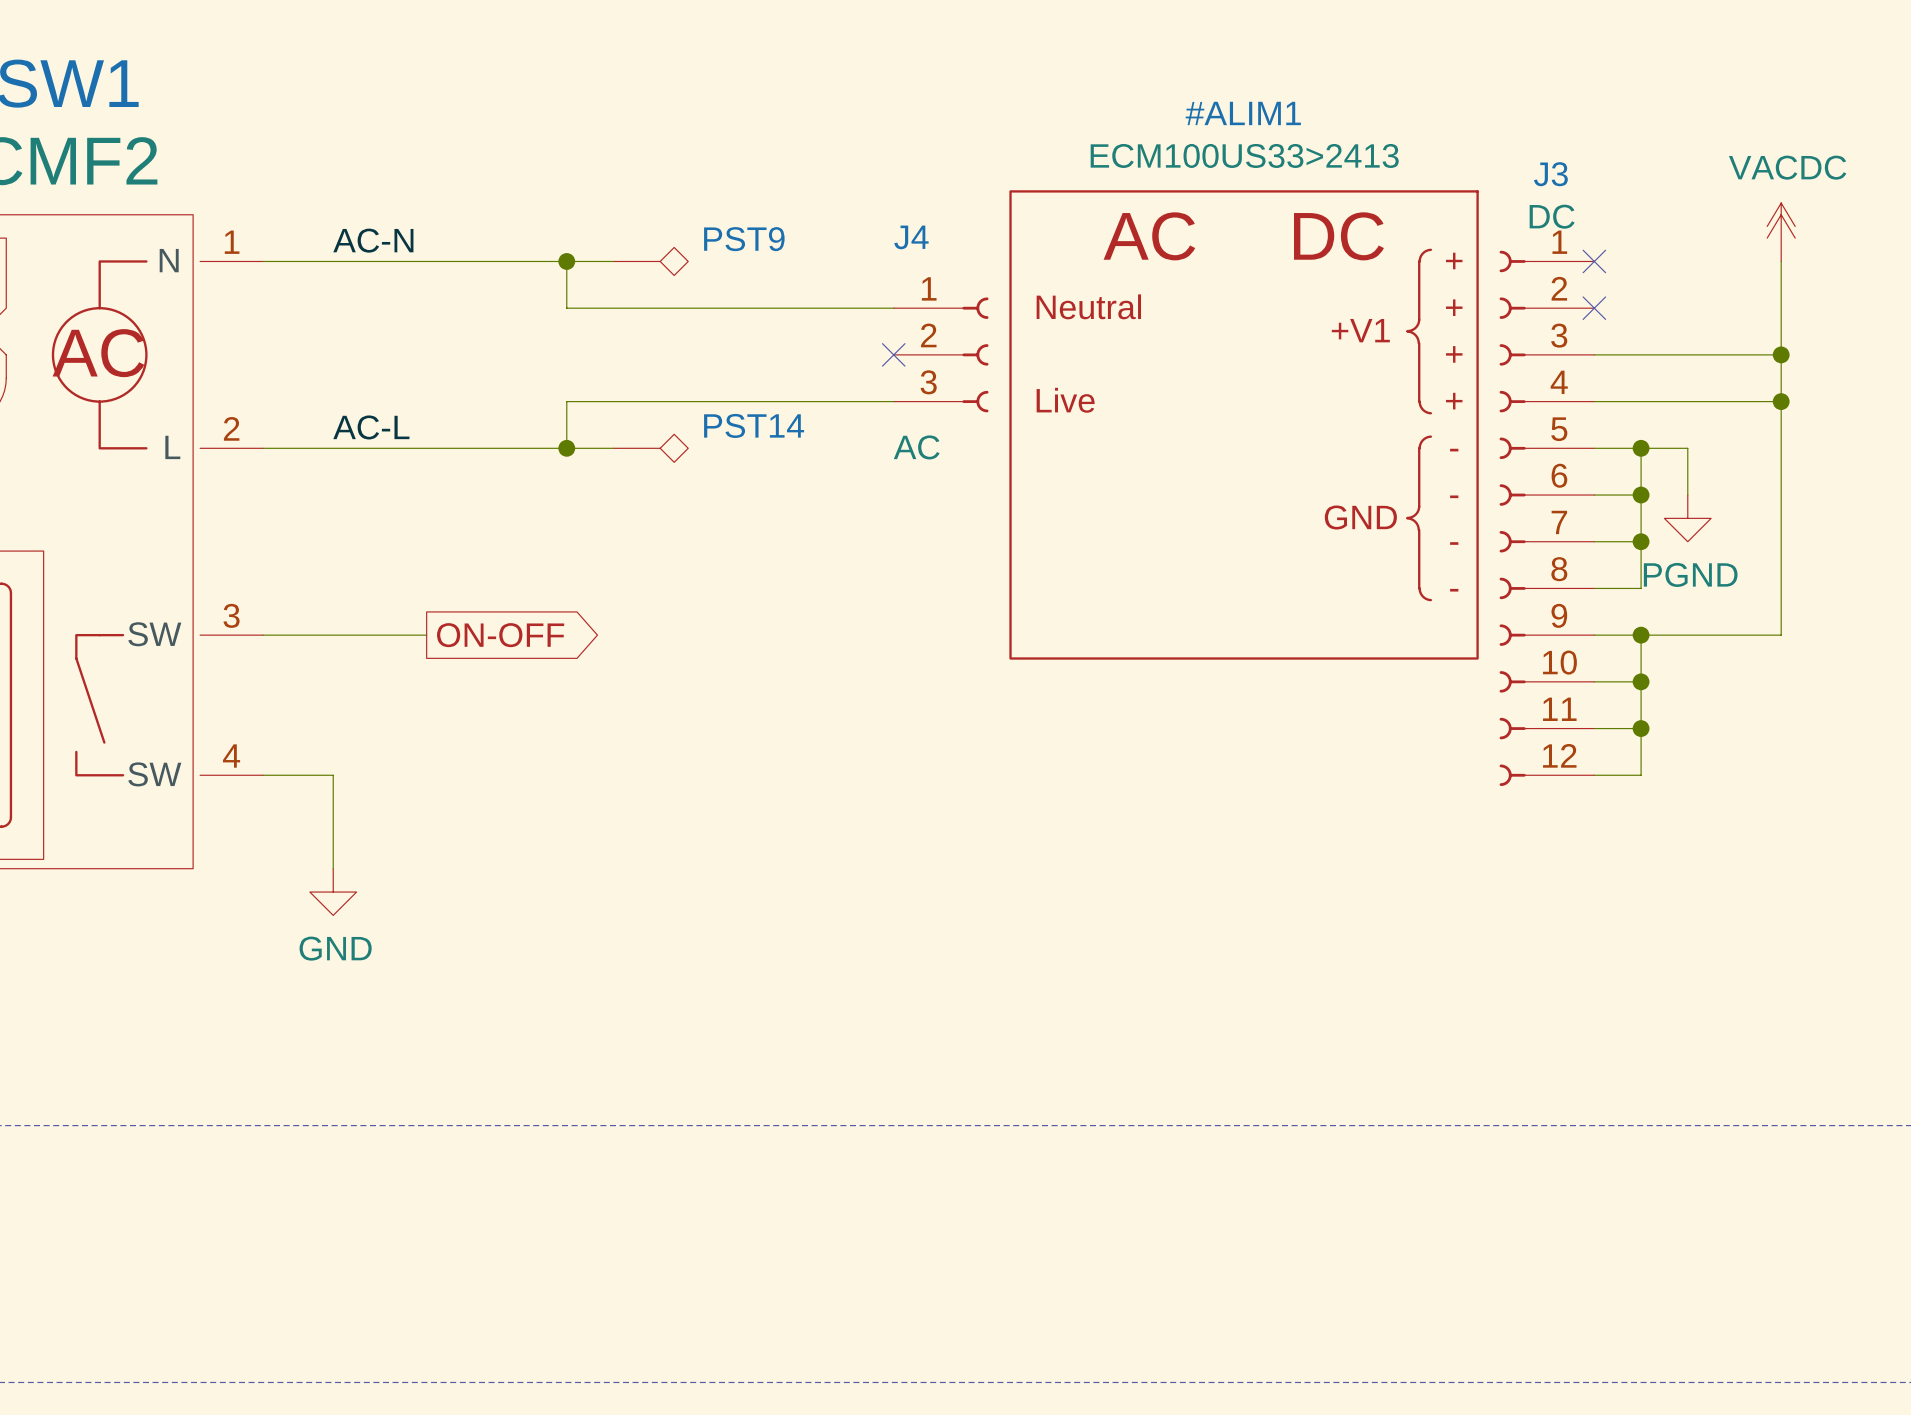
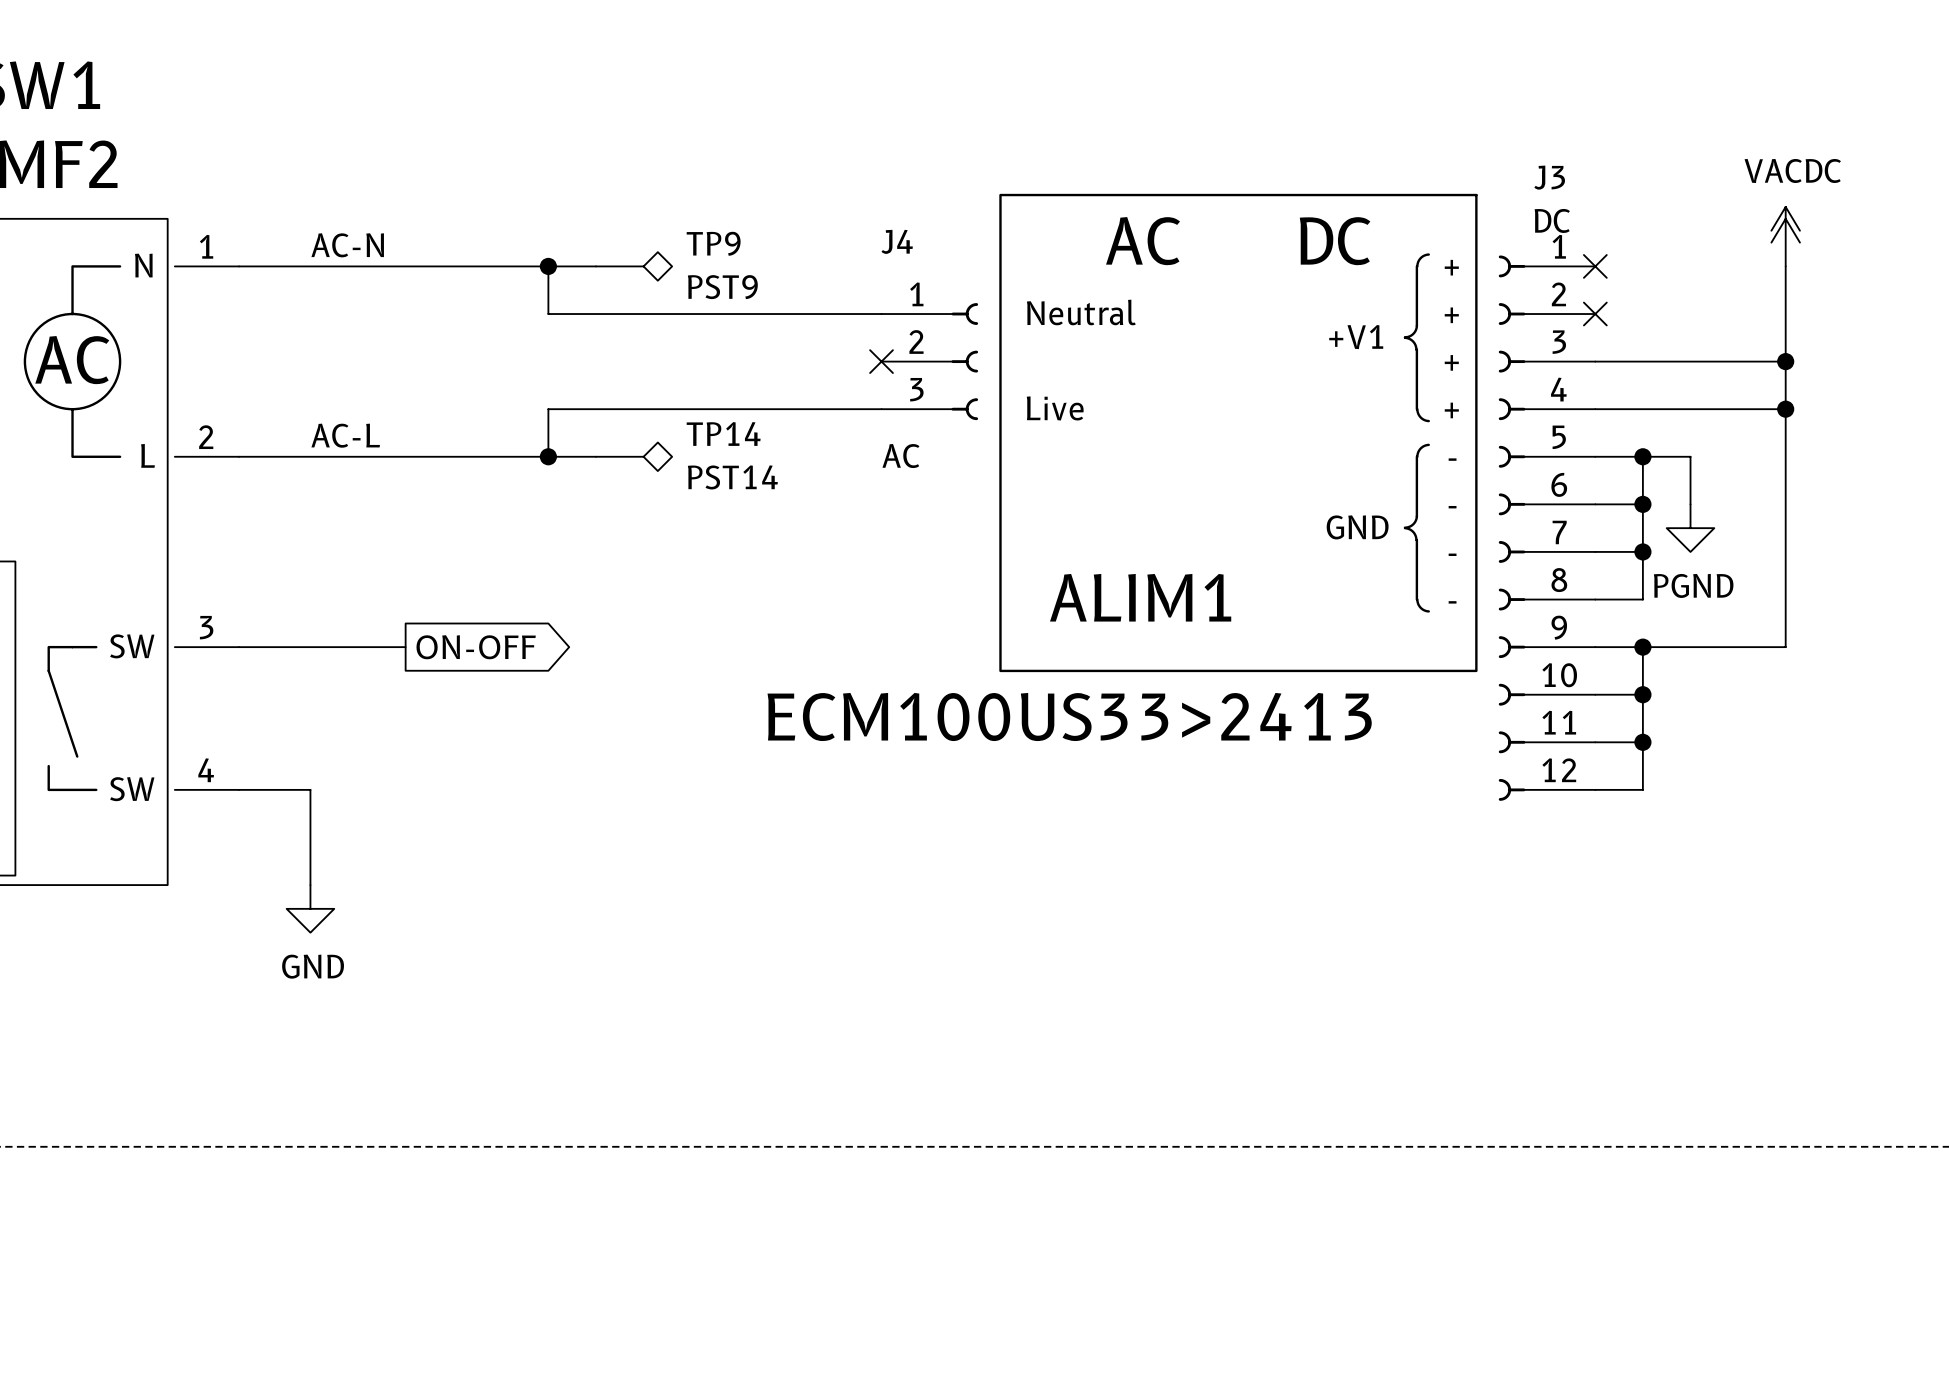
drawing: [1009, 190, 1479, 660] -> none
PST9 name: PST9 (744, 239) -> TP9 (713, 243)
PST9 value: none -> PST9 (722, 287)
ALIM1: none -> ECM100US33>2413 (1238, 432)
PST14 name: PST14 (754, 425) -> TP14 (723, 433)
PST14 value: none -> PST14 (732, 477)

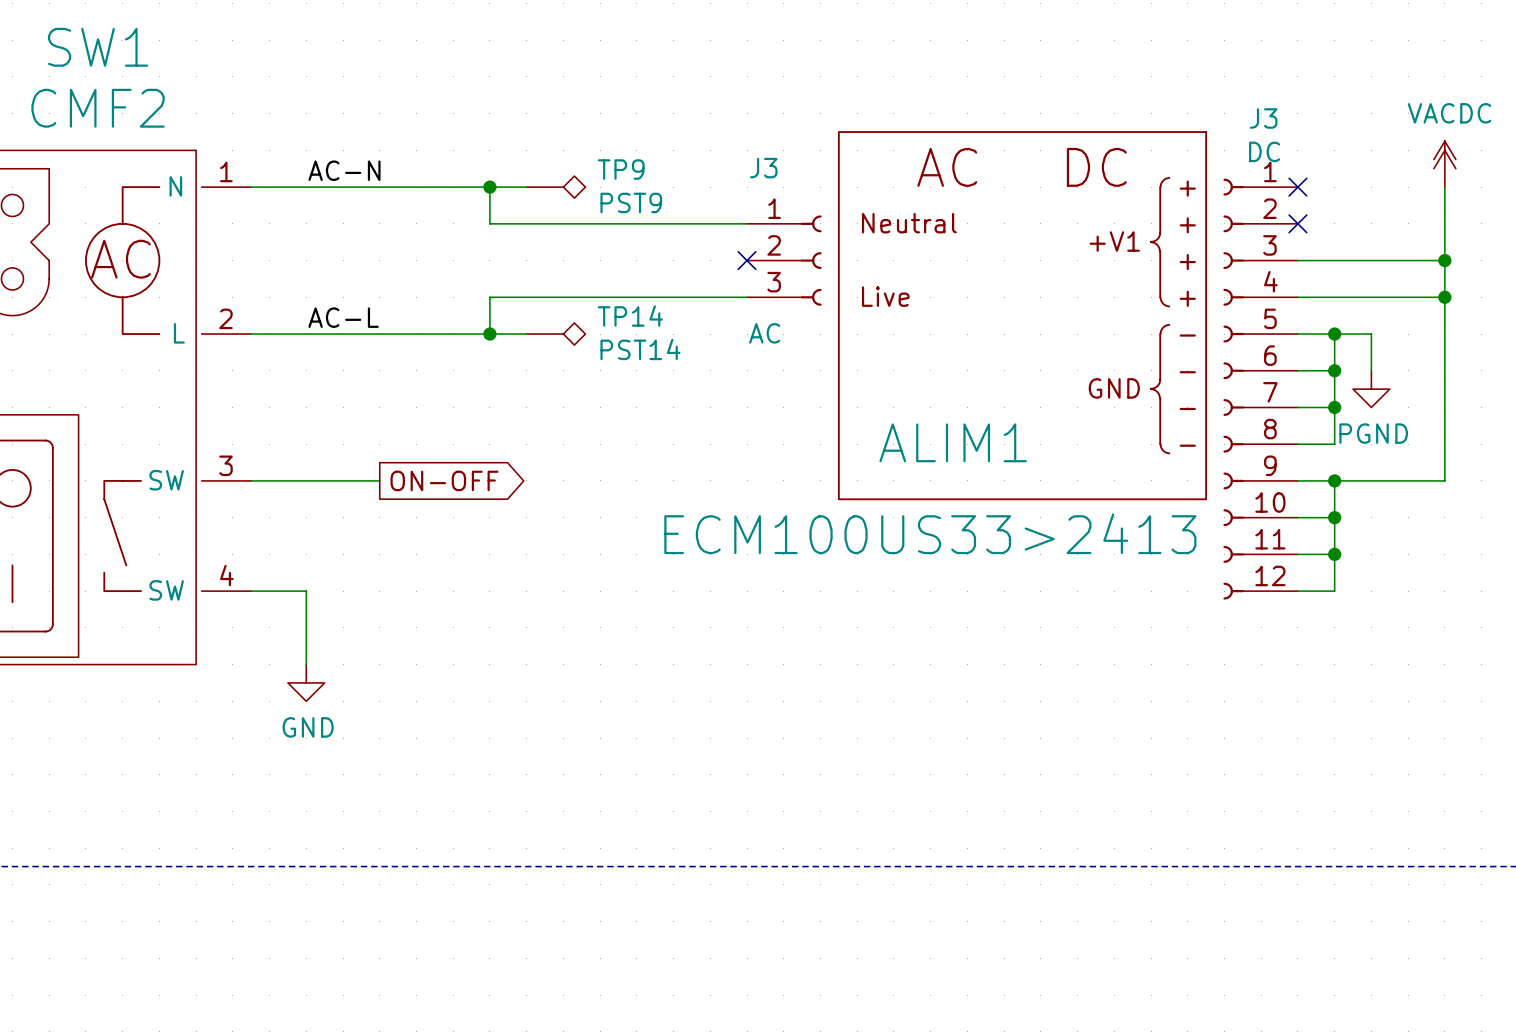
J4 name: J4 (897, 241) -> J3 (763, 168)

